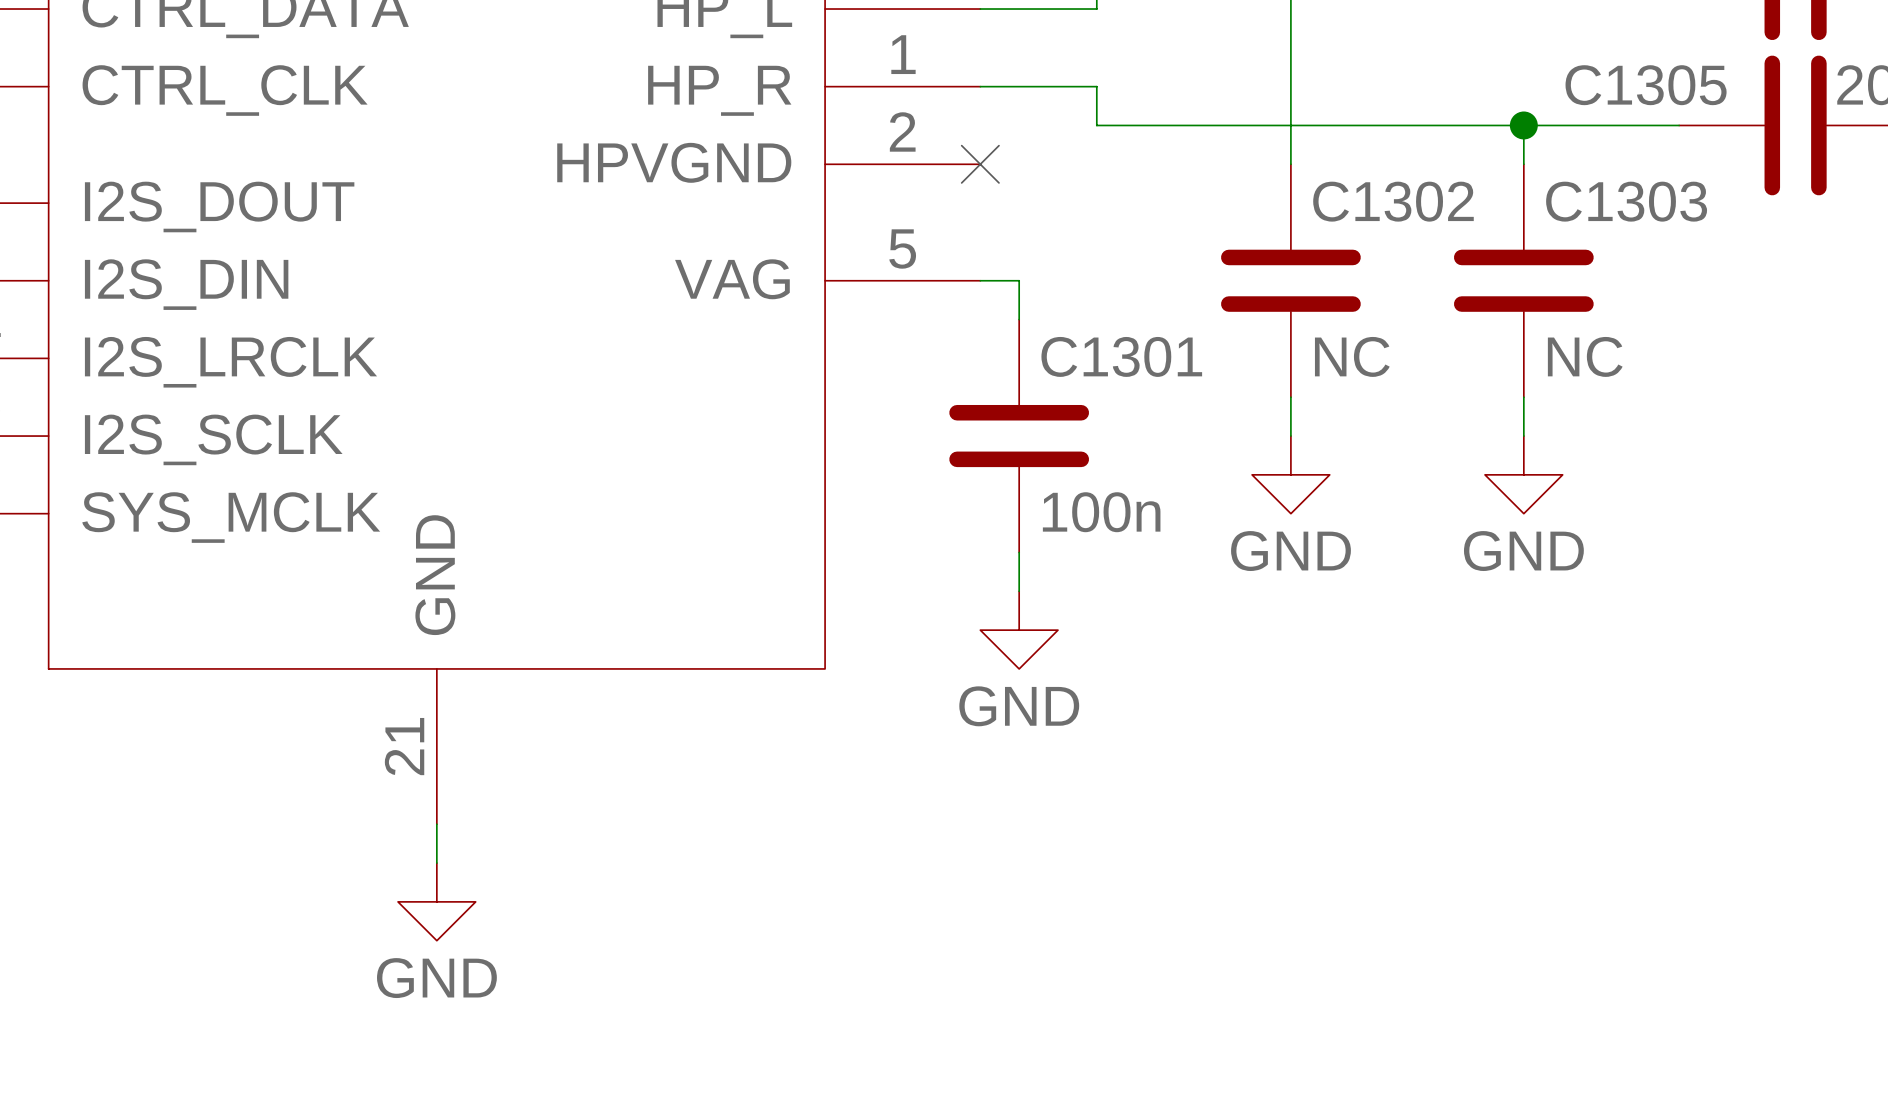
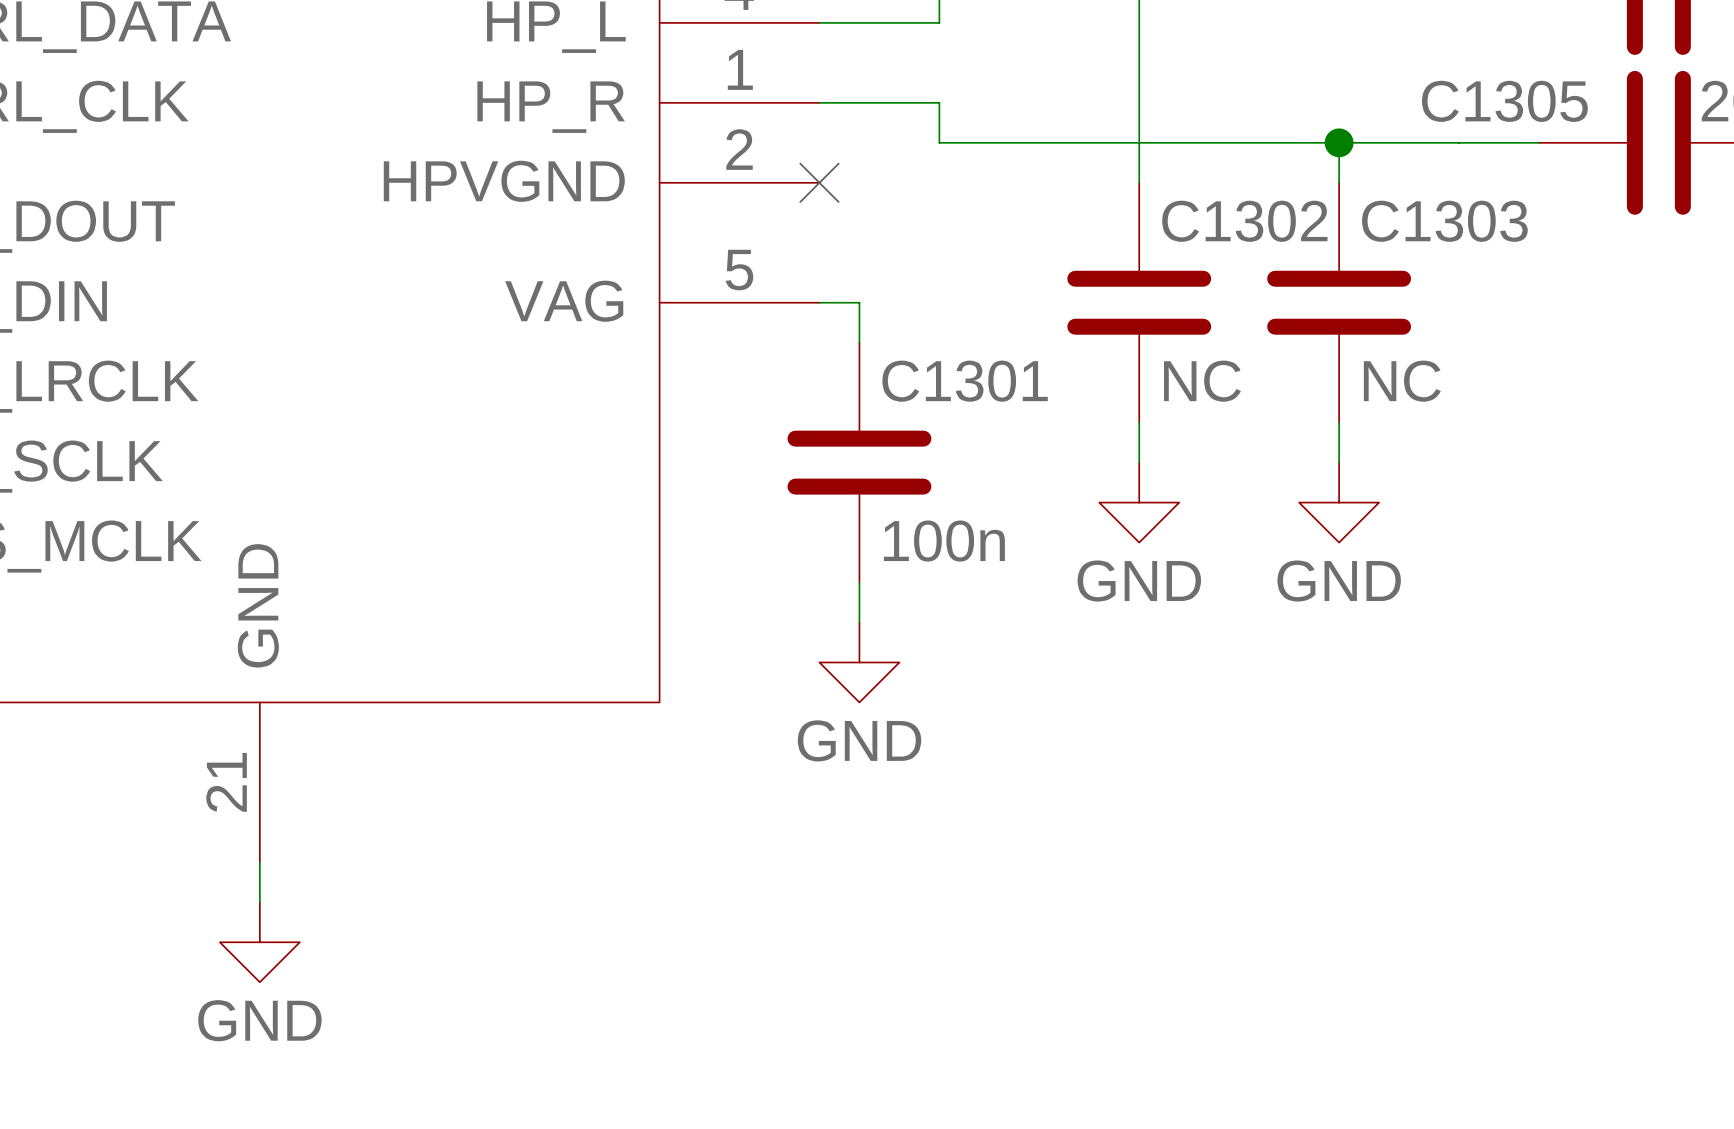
wire: (1523, 125) (1523, 164) -> (1339, 142) (1339, 182)
junction position: (1523, 125) -> (1339, 142)
C1303 position: (1523, 280) -> (1339, 302)
wire: (1523, 397) (1523, 436) -> (1339, 422) (1339, 462)
power symbol position: GND (1523, 474) -> GND (1339, 502)

